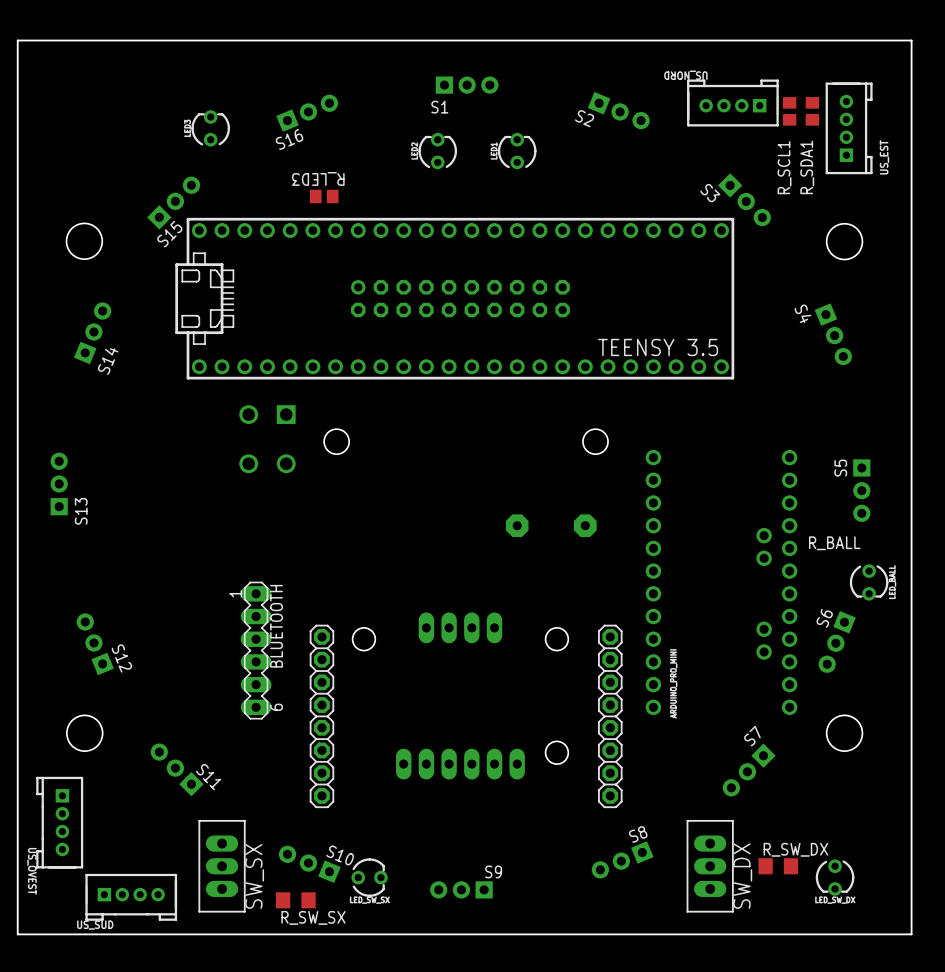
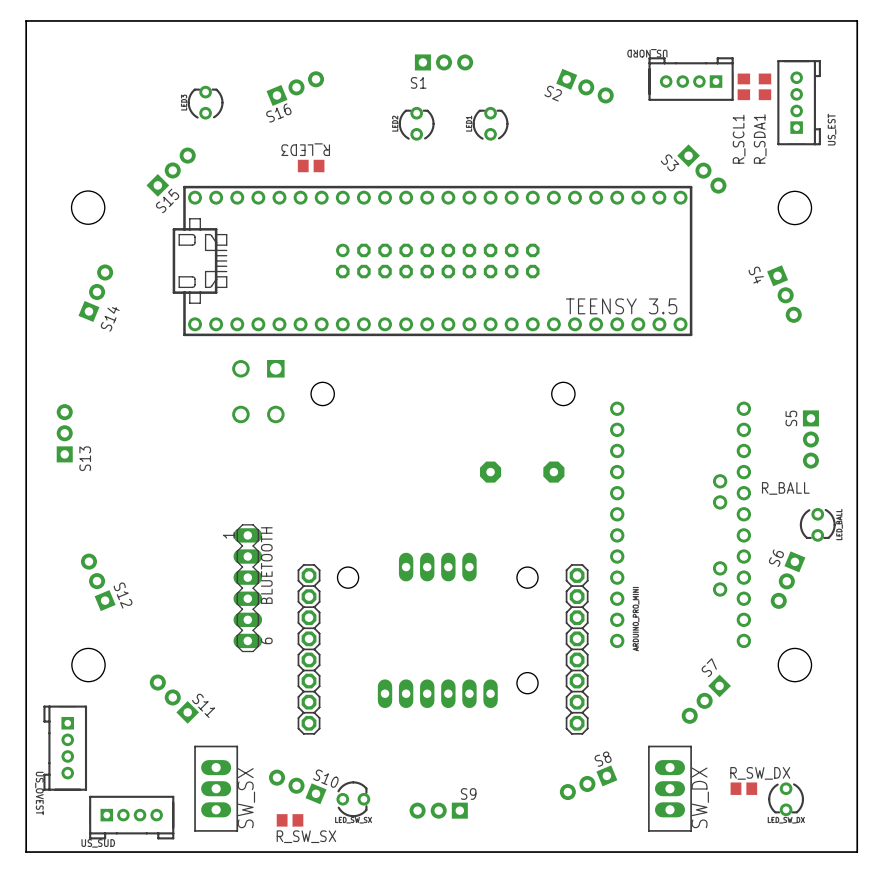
R_SW_DX: (778, 866) -> none
R_SW_DX: none -> (743, 788)
R_SW_SX footprint: [275, 892, 316, 909] -> [276, 814, 304, 827]

